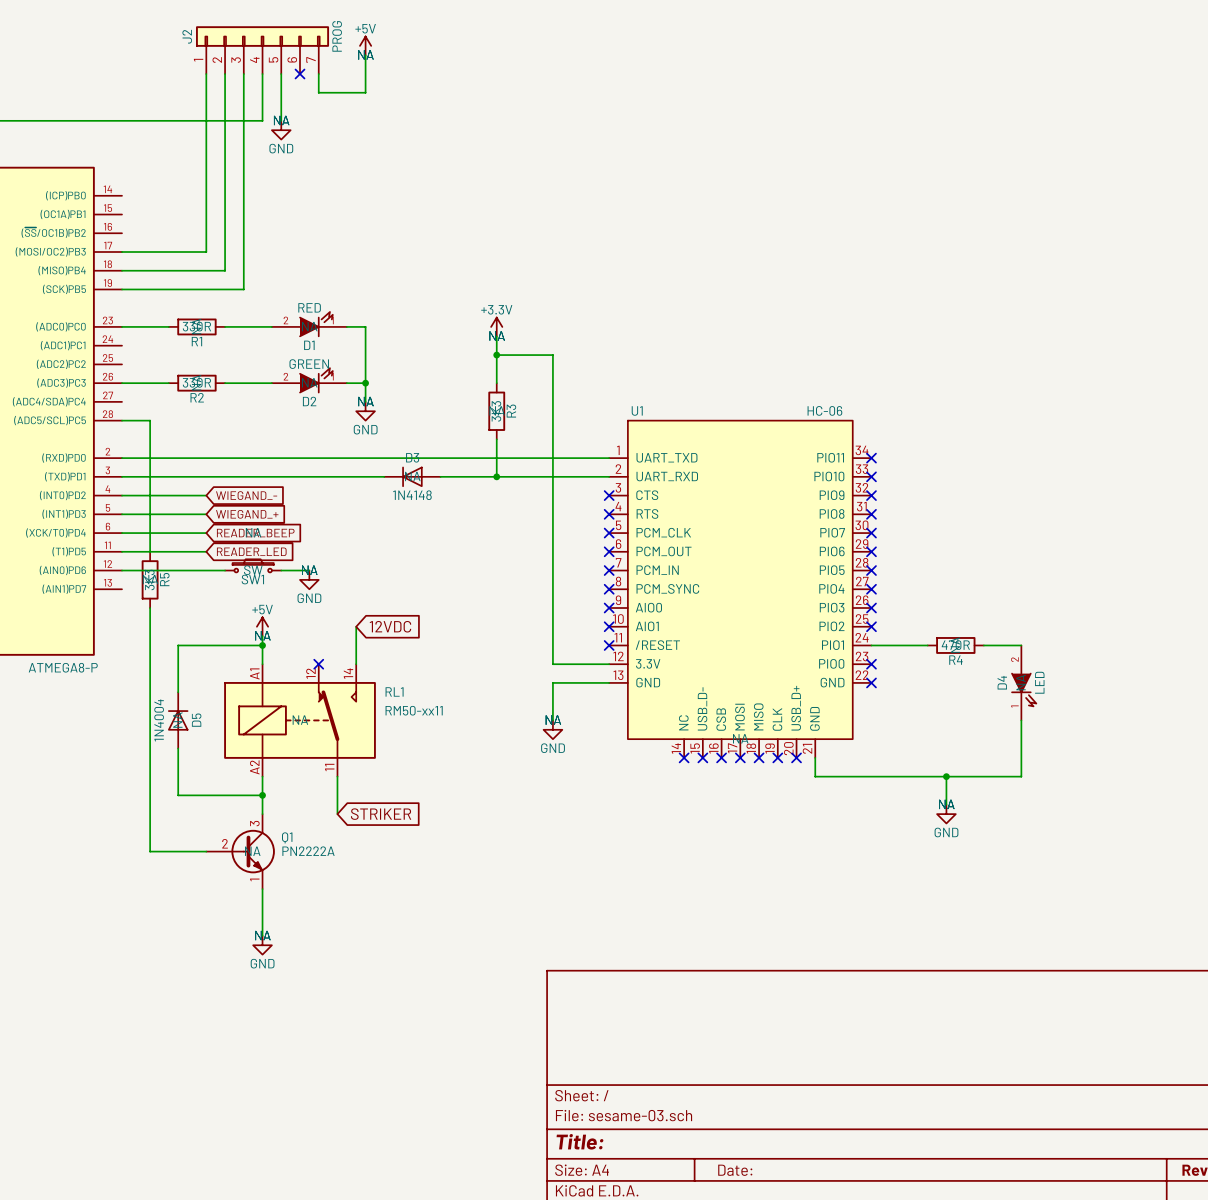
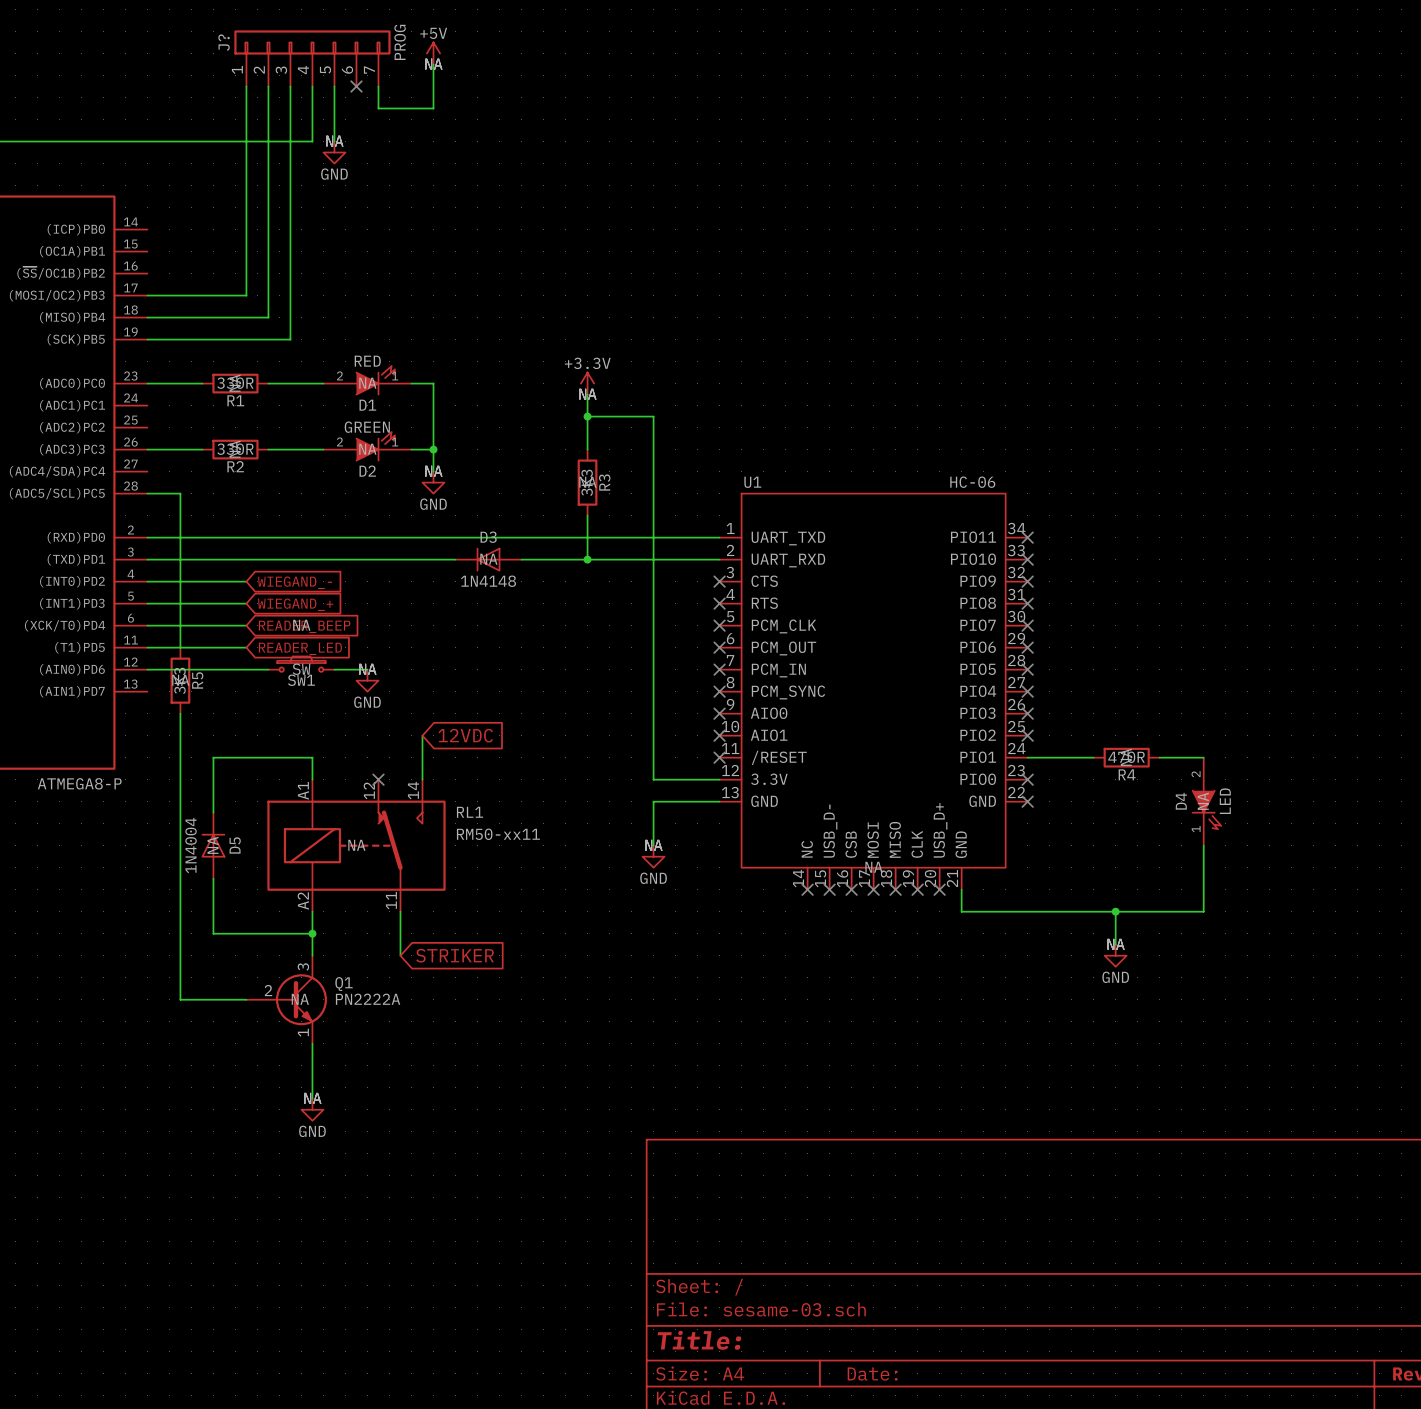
J2 name: J2 (187, 36) -> J? (224, 42)
power symbol: +5V (262, 626) -> none
wire: (262, 636) (262, 645) -> none
junction: (262, 645) -> none

